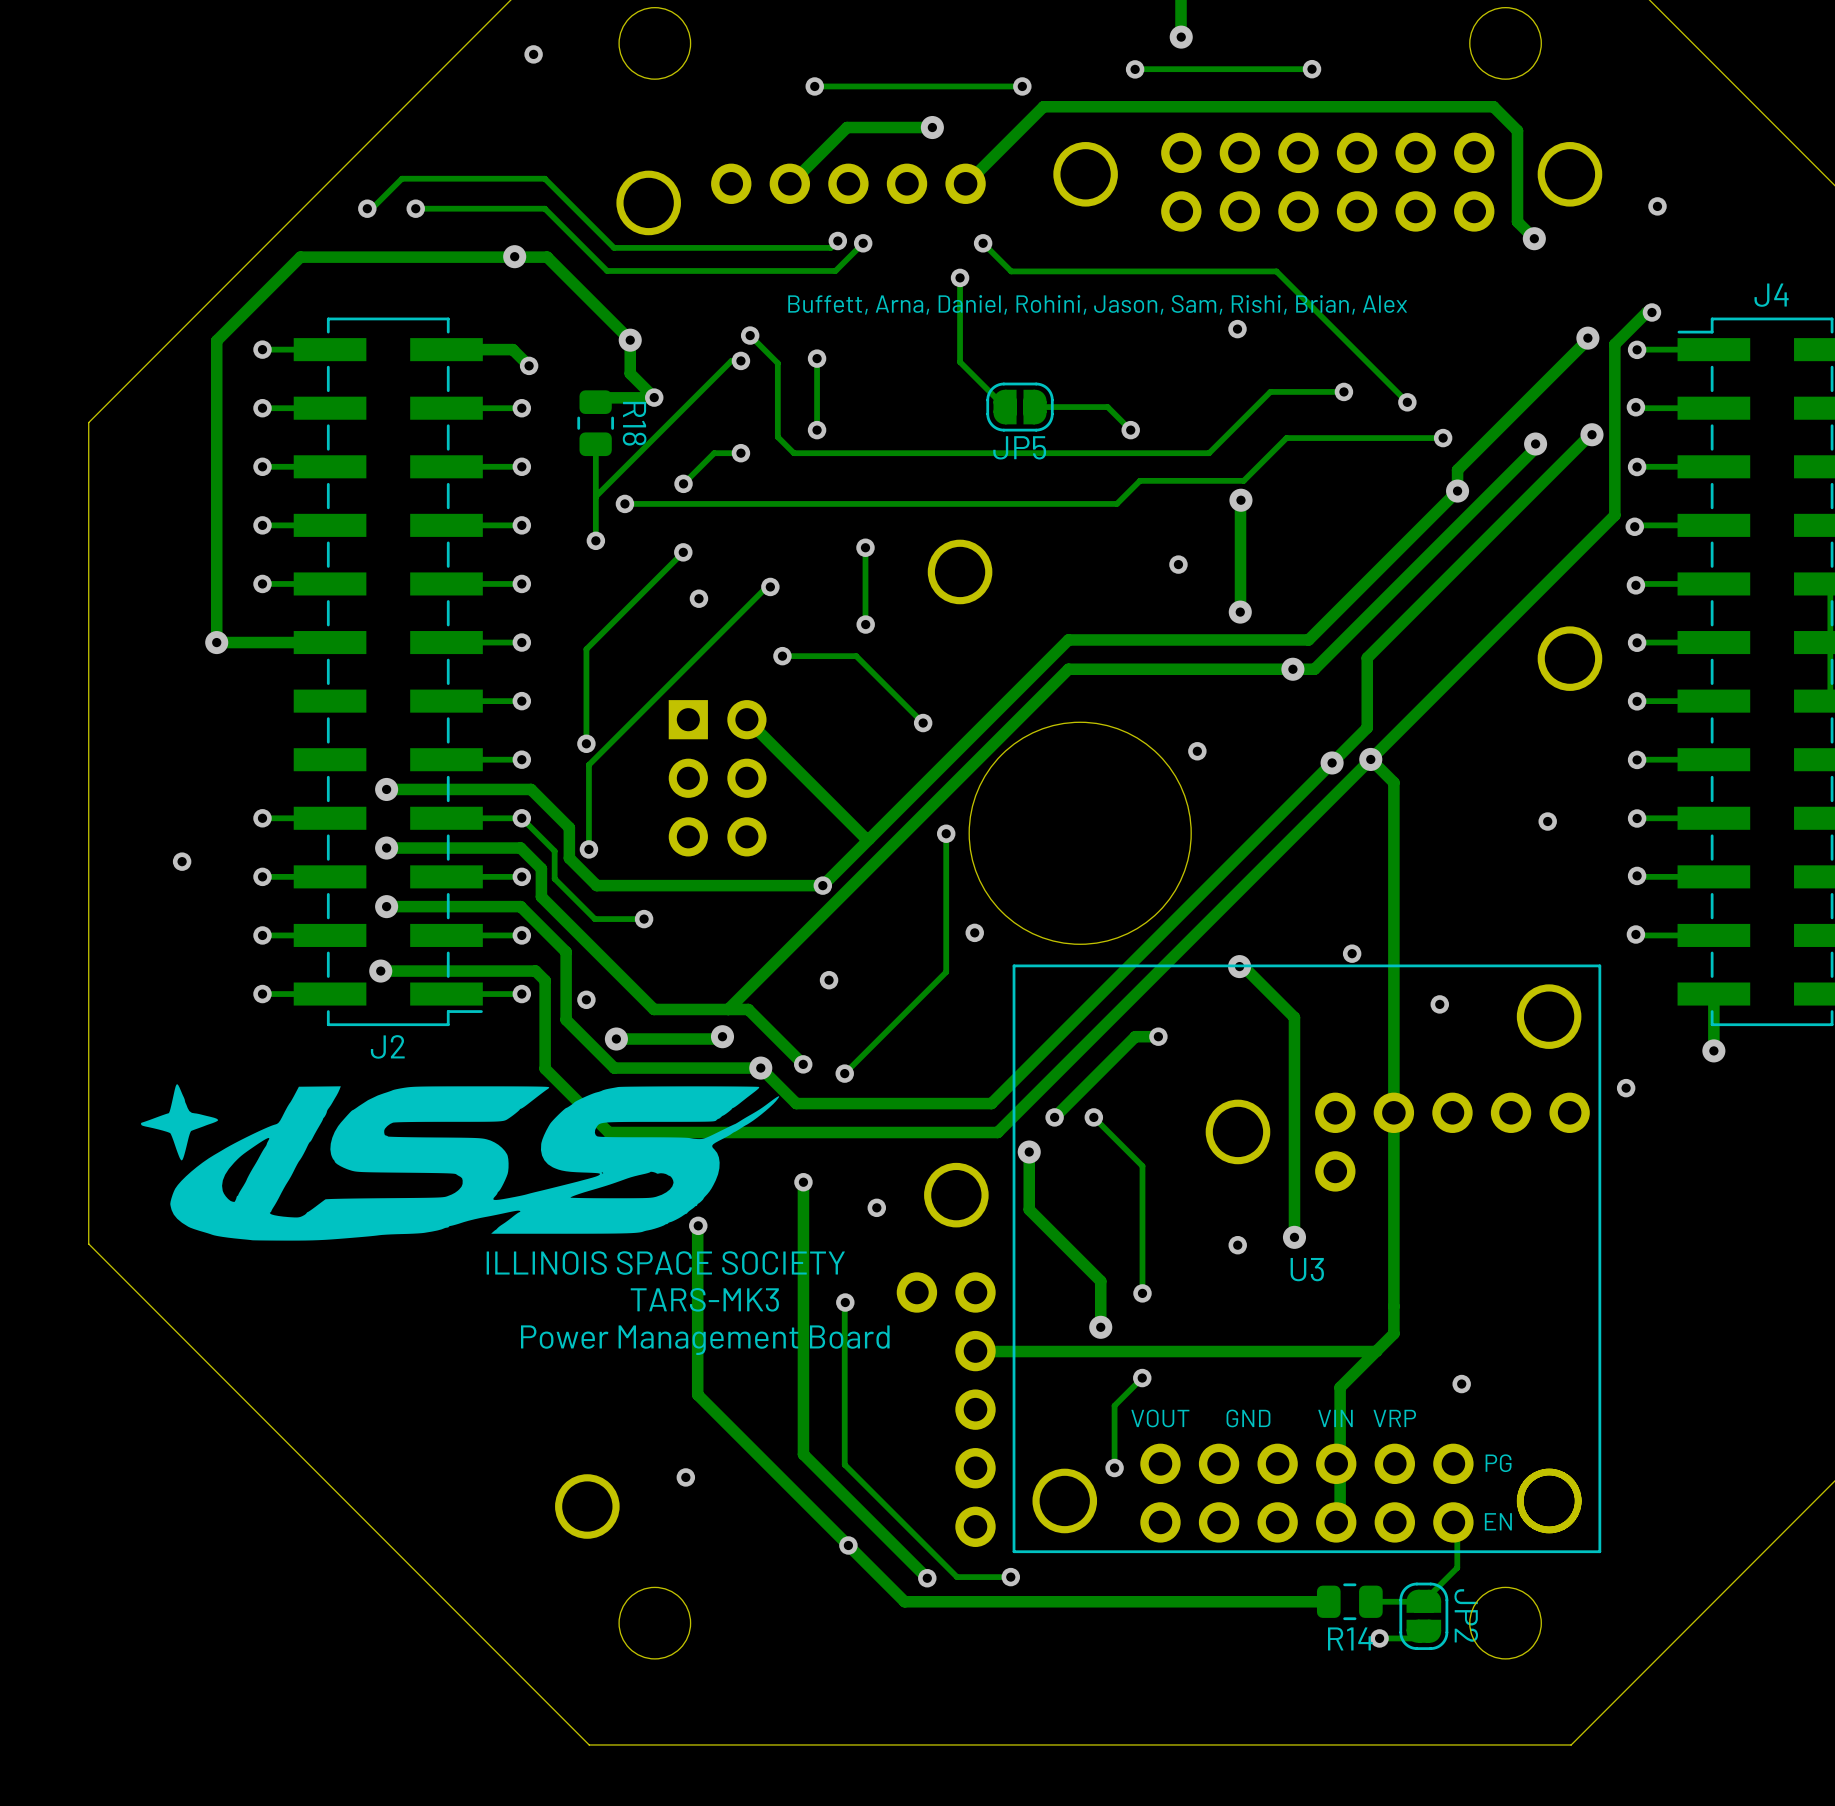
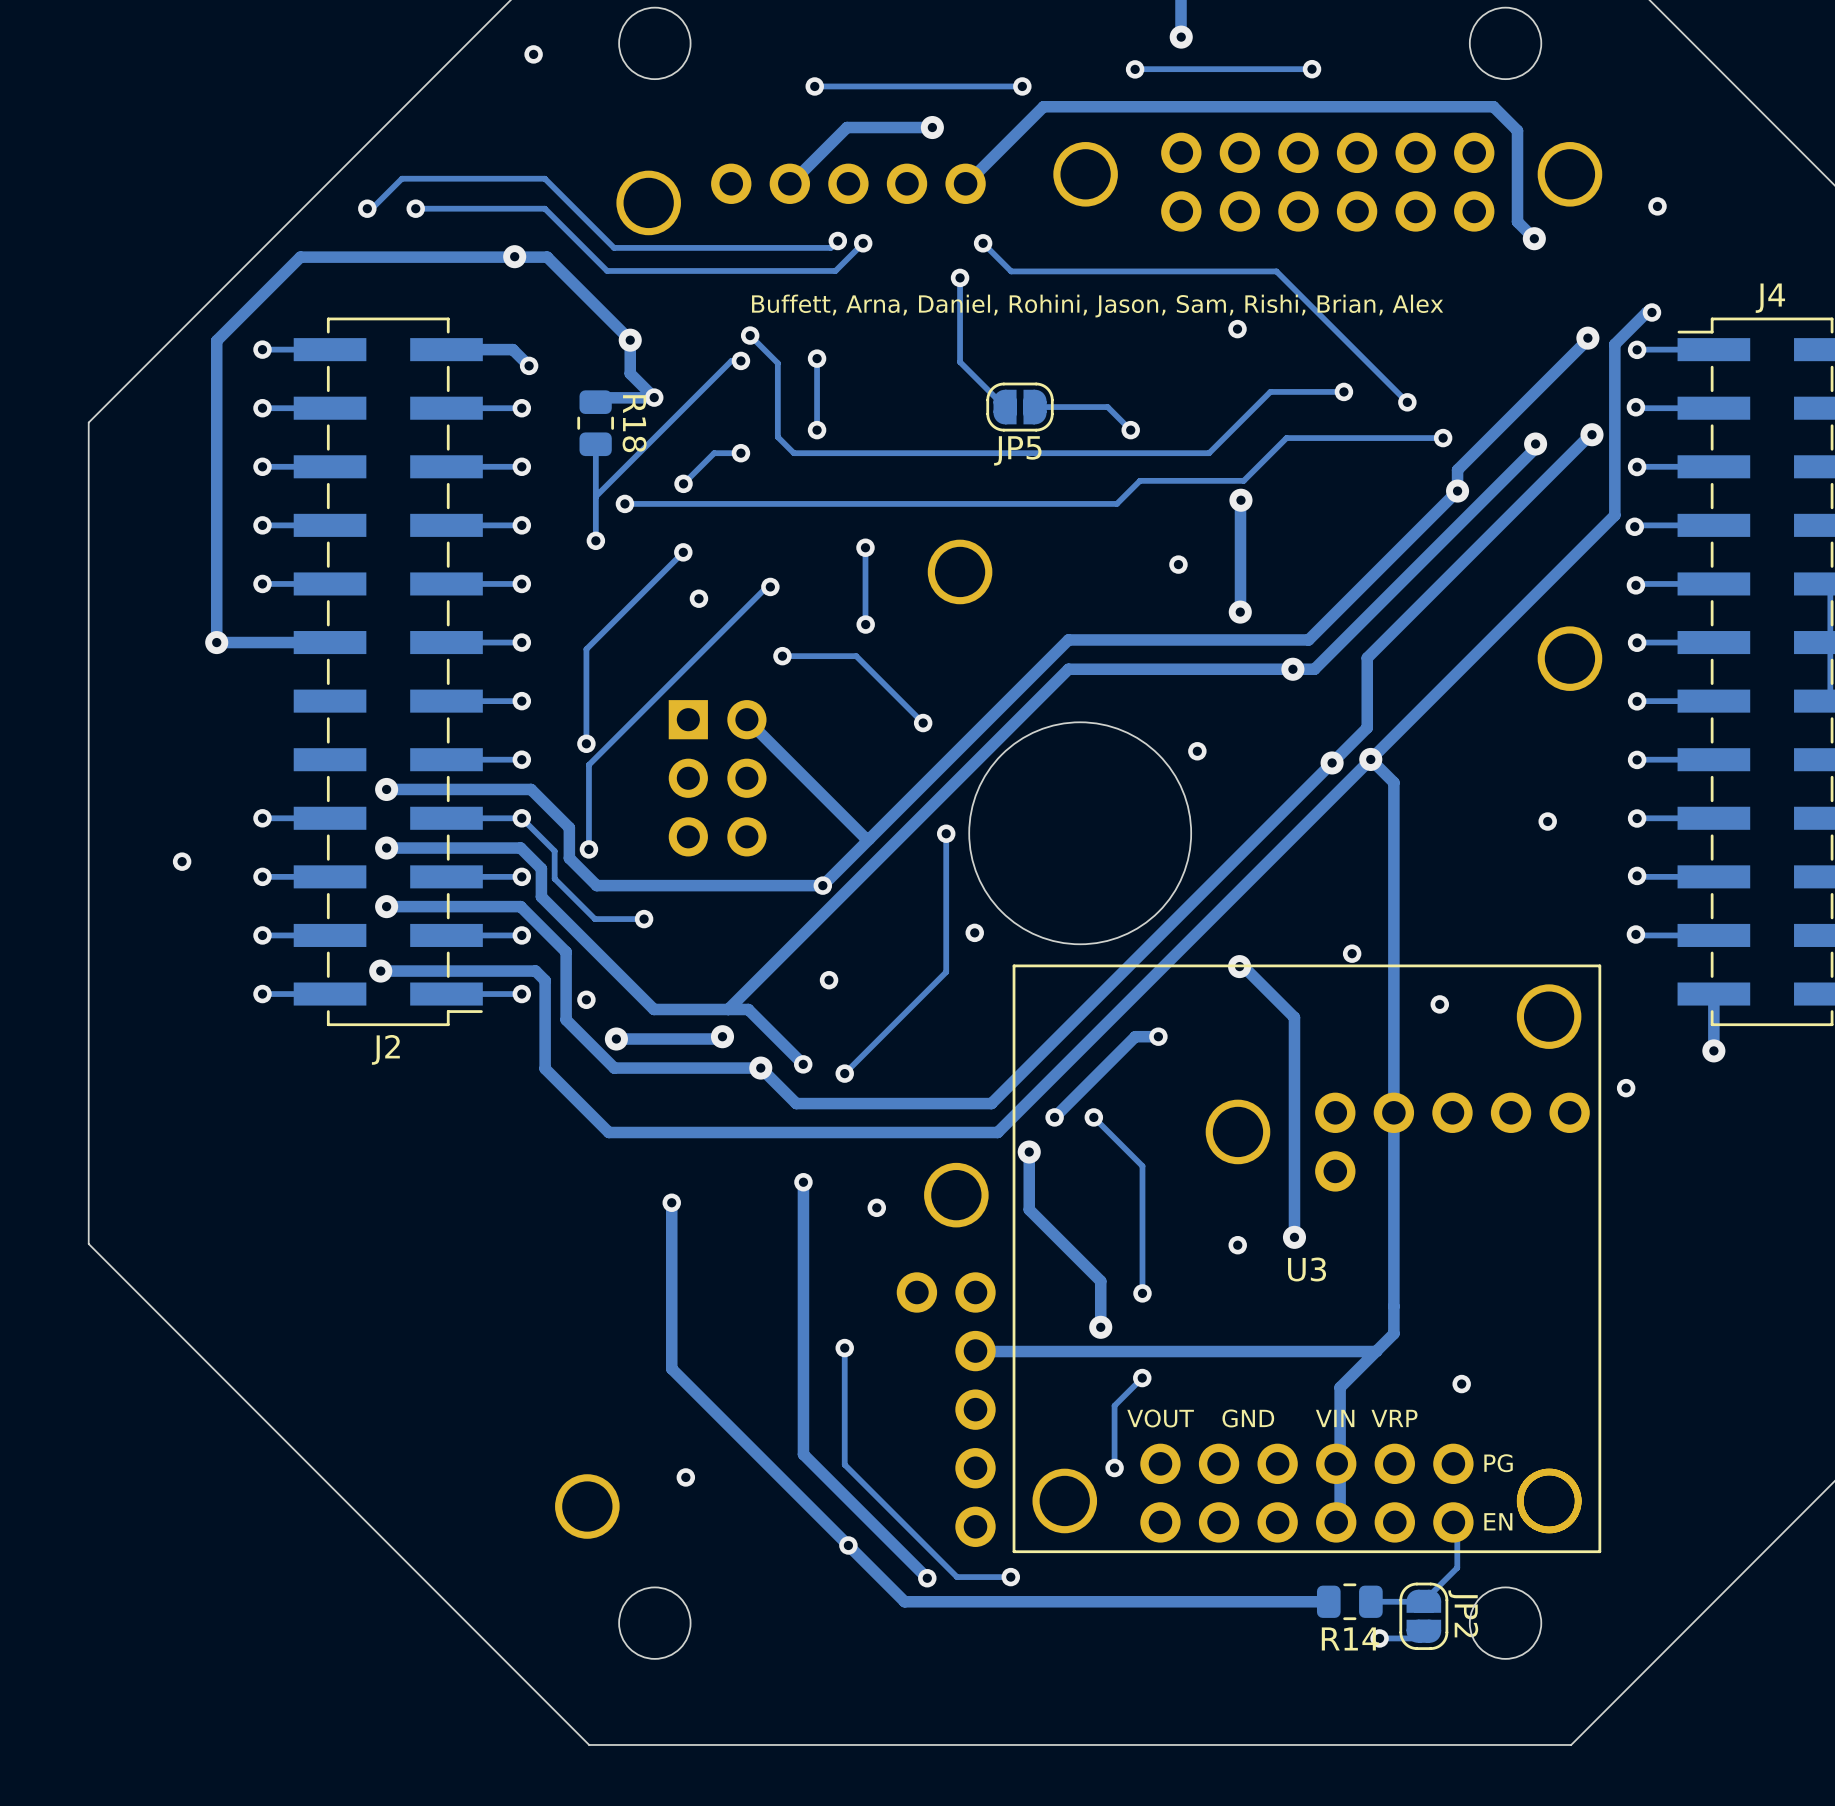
drawing: [141, 1084, 780, 1241] -> none
track: (698, 1225) (697, 1394) -> (671, 1202) (671, 1368) (697, 1394)
via position: (698, 1225) -> (671, 1202)
text: ILLINOIS SPACE SOCIETY (665, 1263) -> none
text: TARS-MK3 (704, 1299) -> none
track: (845, 1302) (844, 1348) -> none
via position: (845, 1302) -> (844, 1348)
text: Power Management Board (705, 1340) -> none

